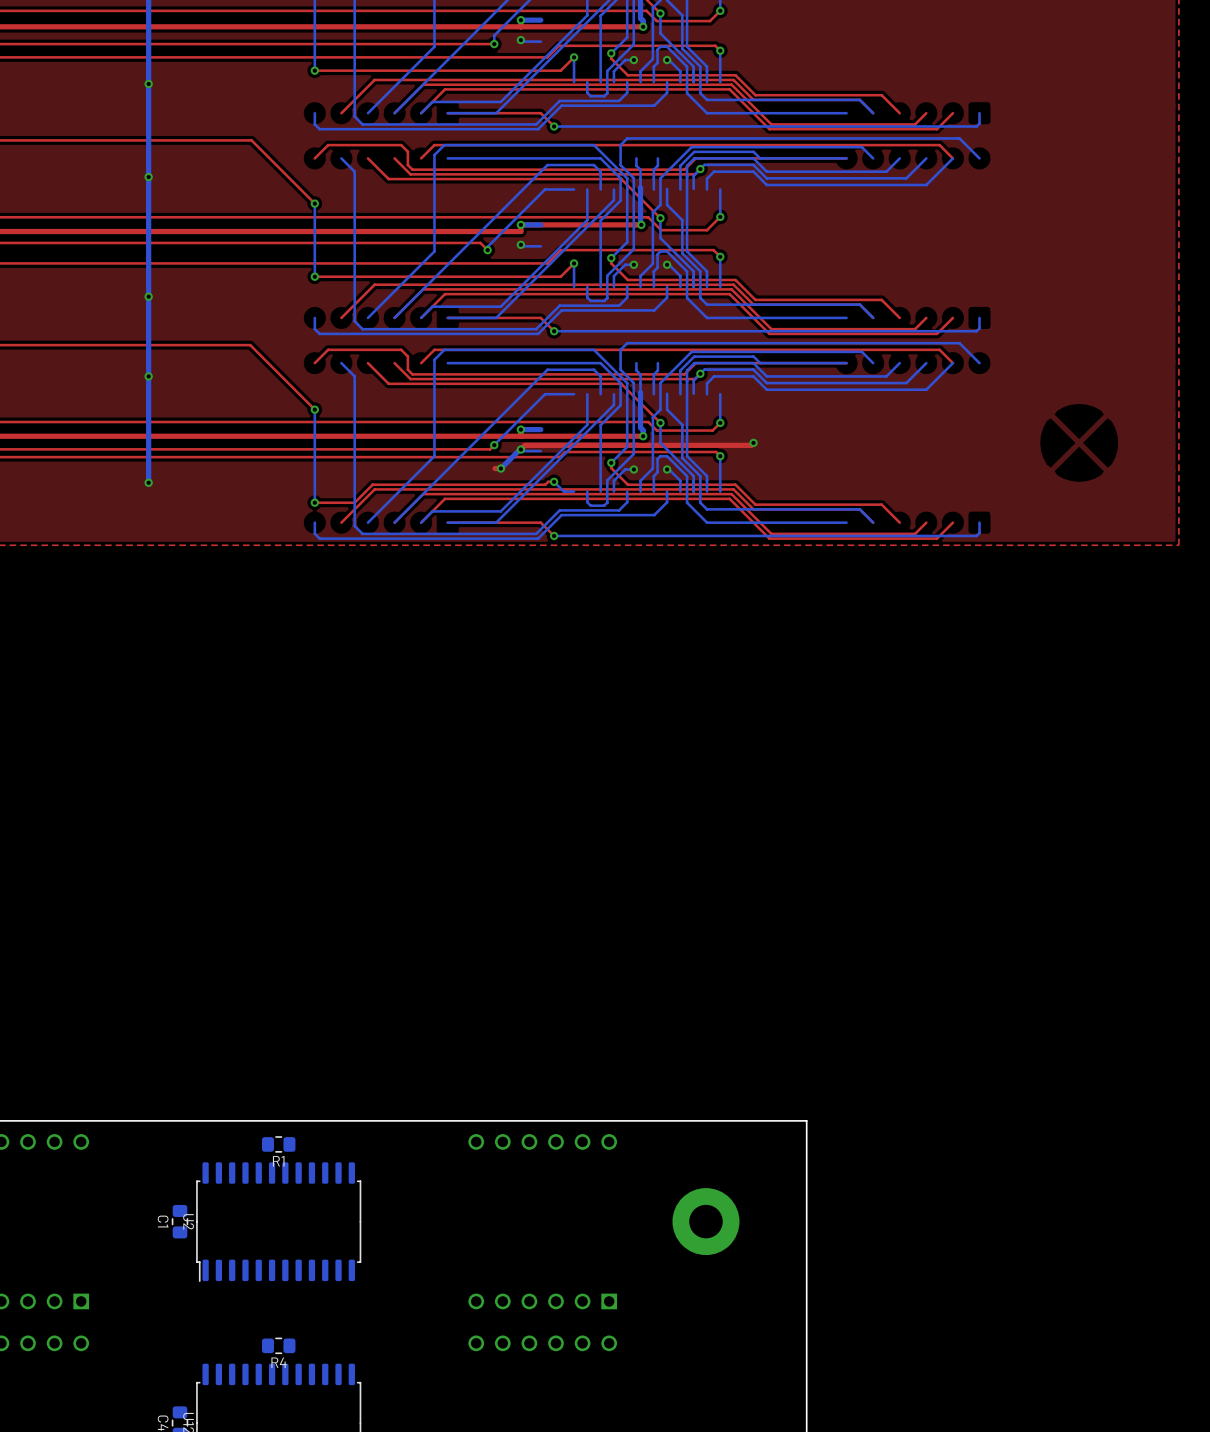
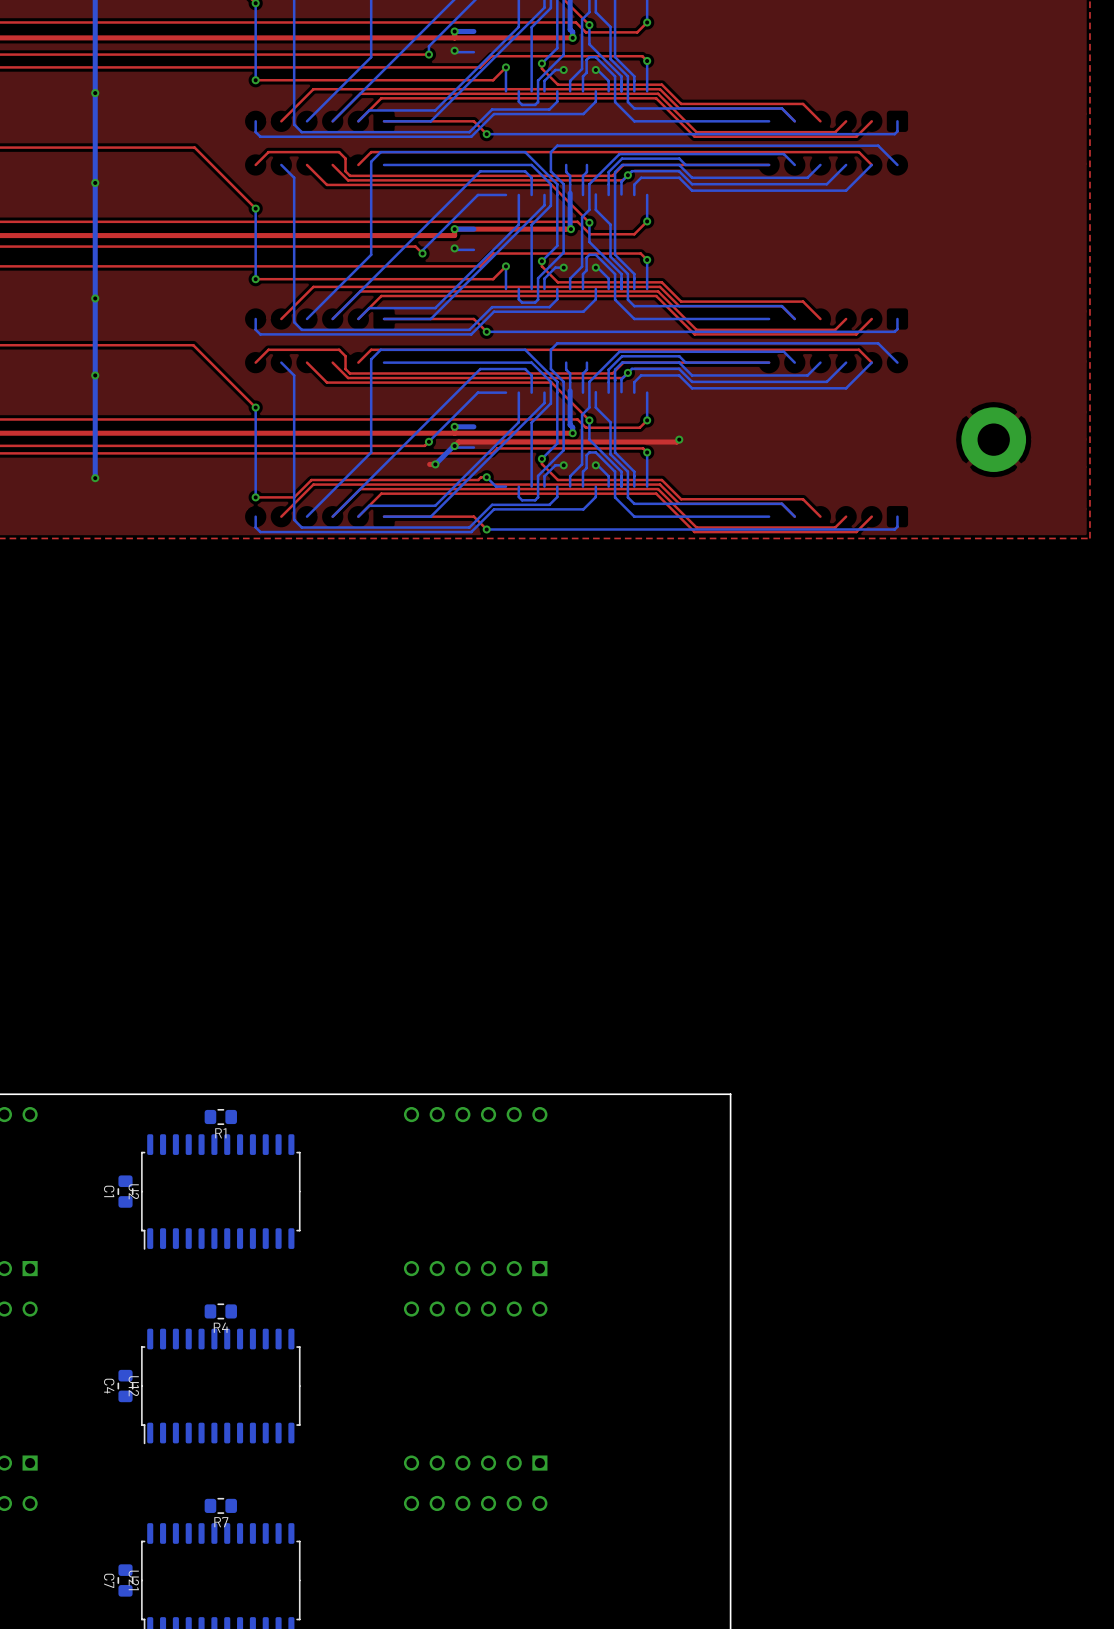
part: none -> (993, 439)
part: (706, 1221) -> none

